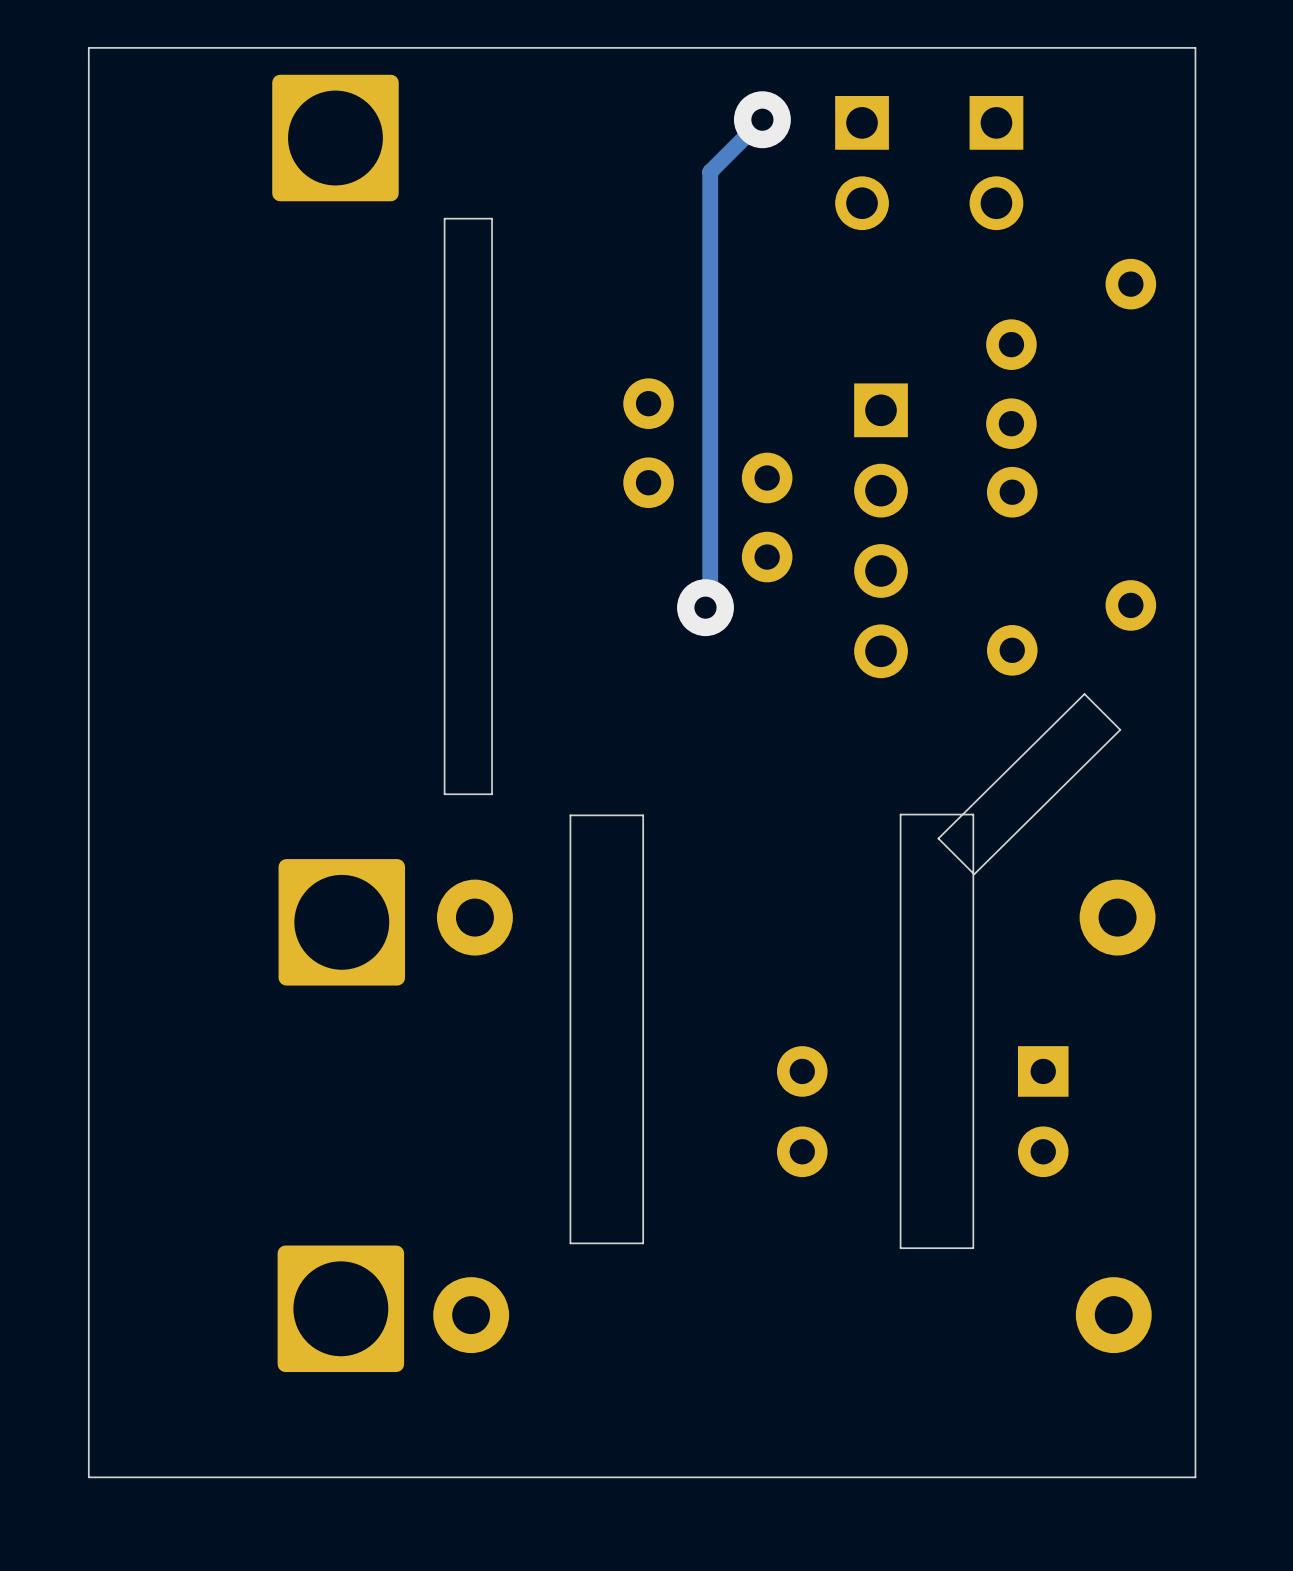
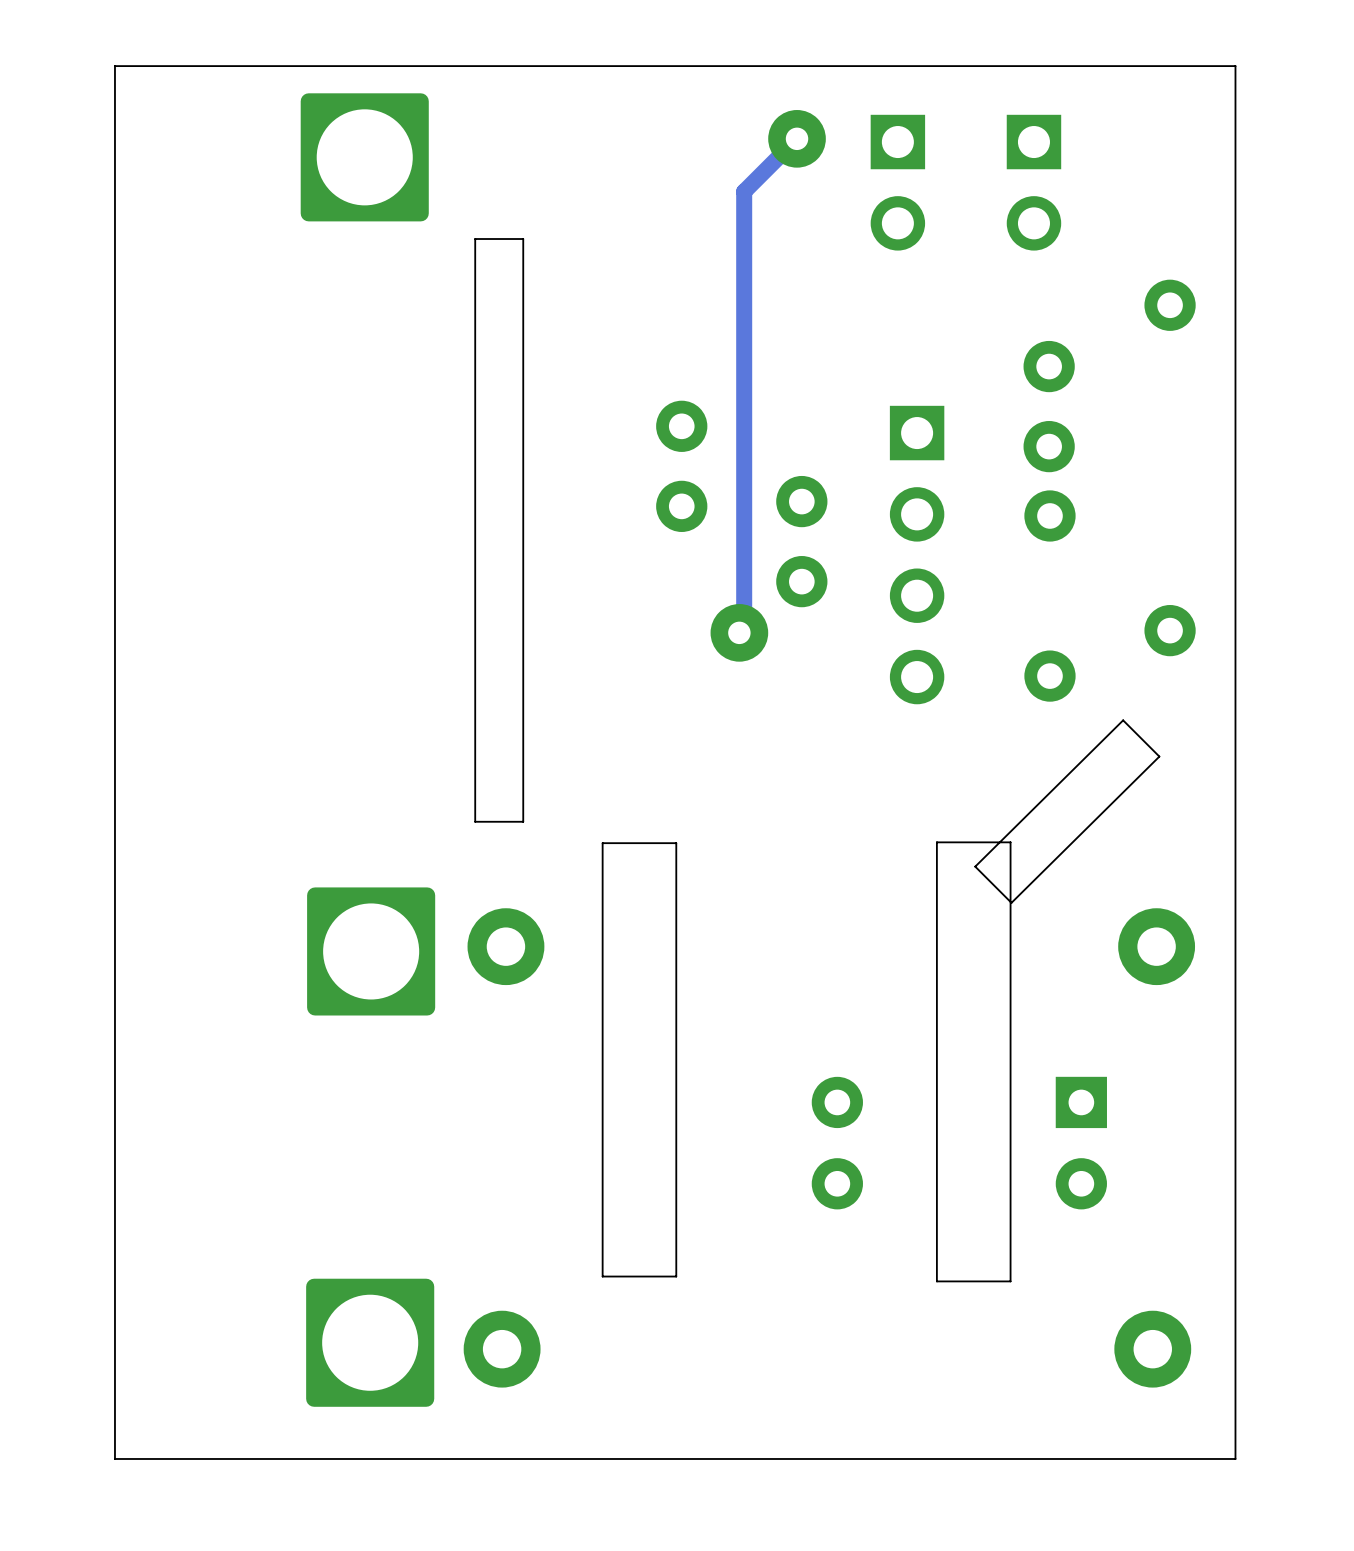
board edge: (1195, 1423) (1195, 1477) (88, 1477) (88, 1423) -> (1235, 1458) (114, 1458)

